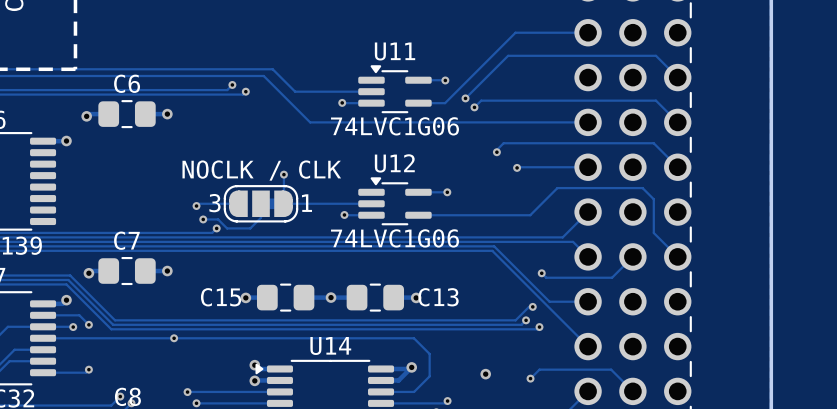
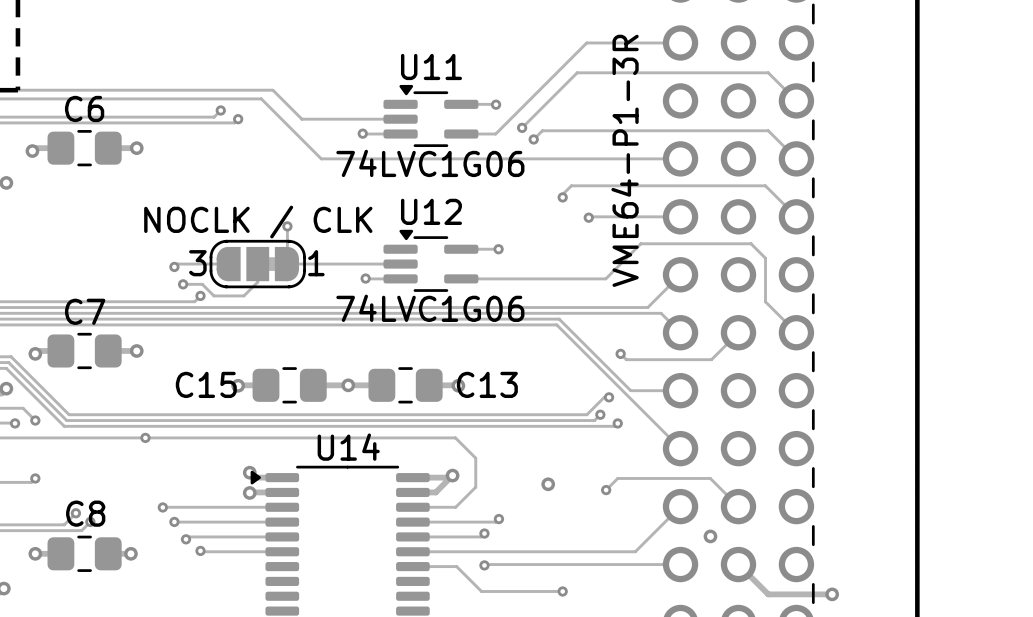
part value: none -> VME64-P1-3R (625, 160)

